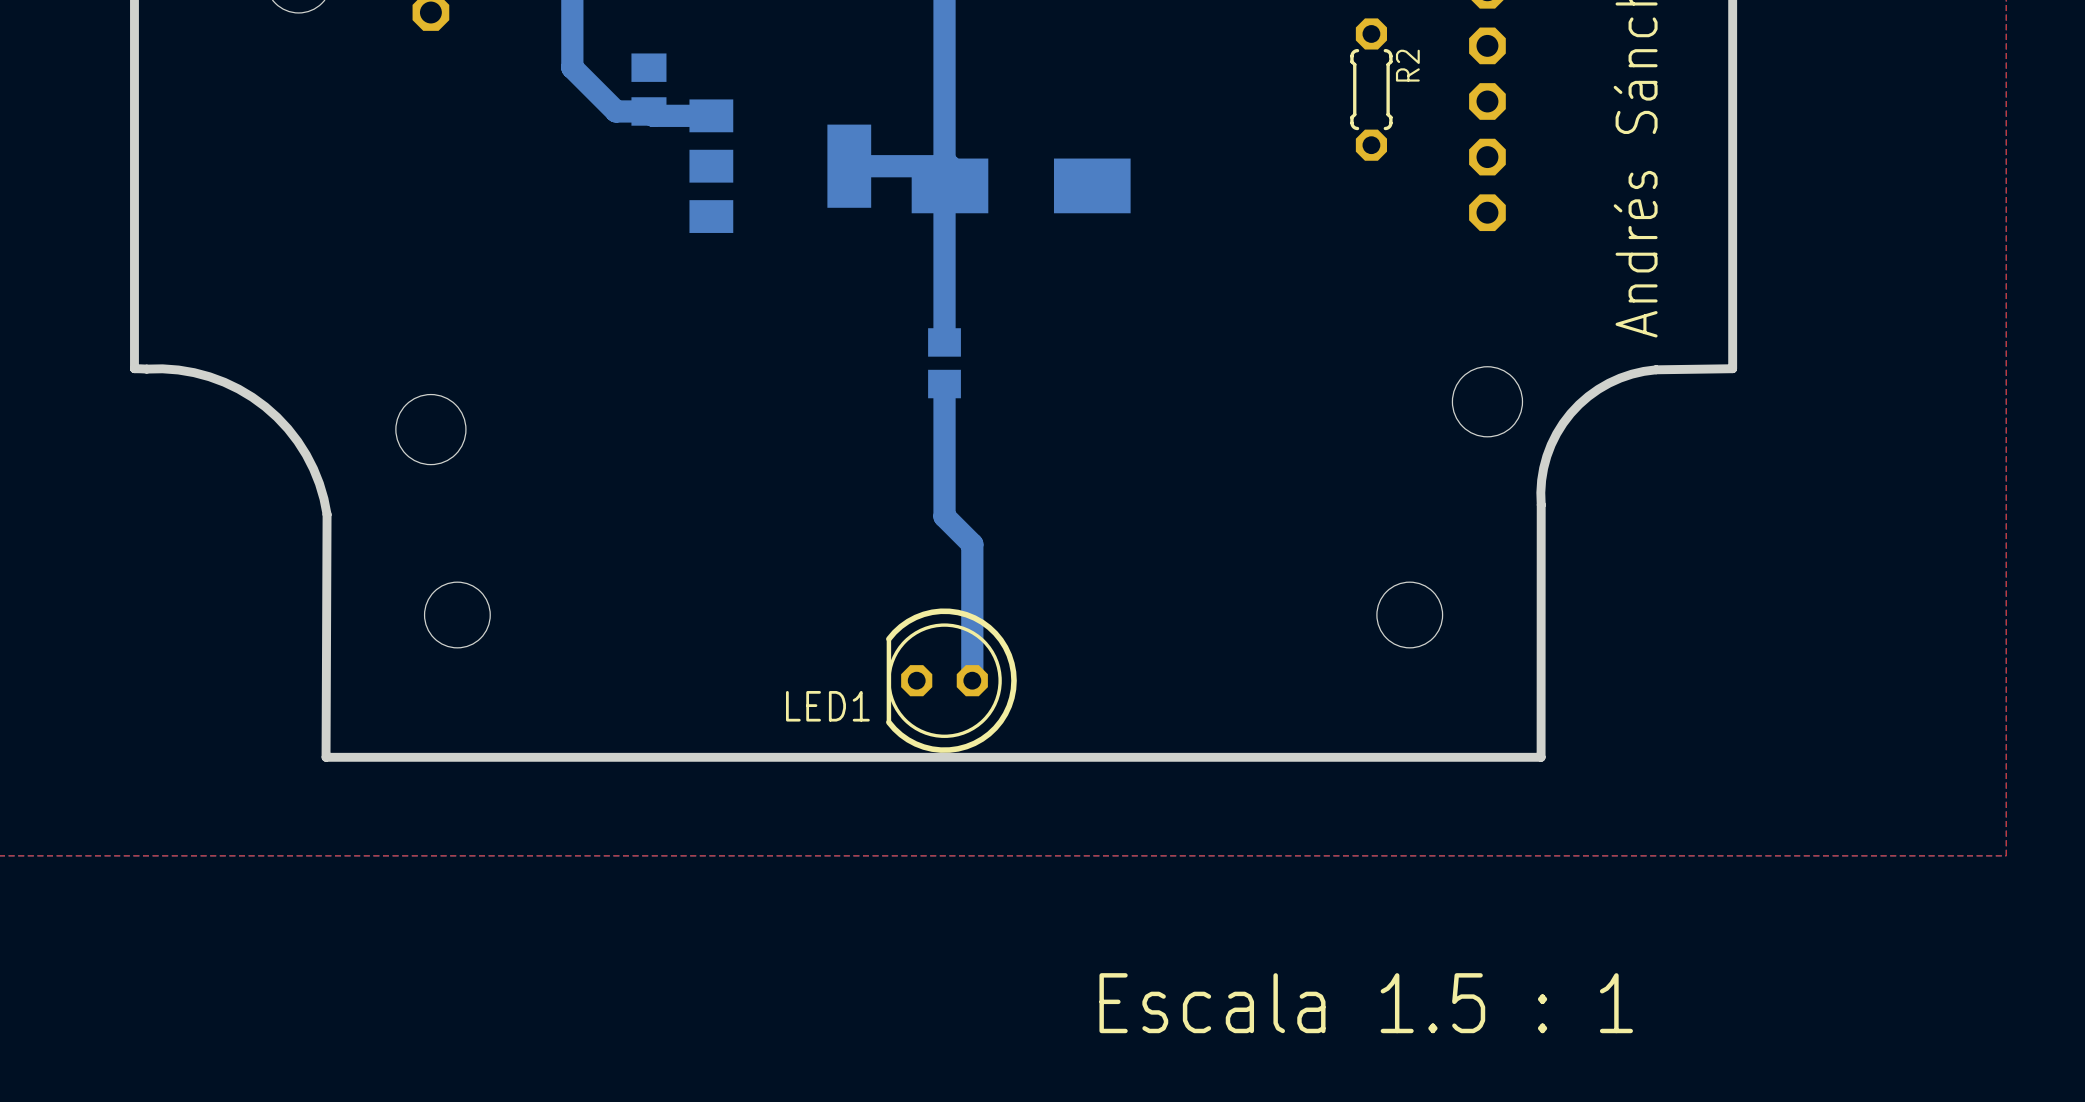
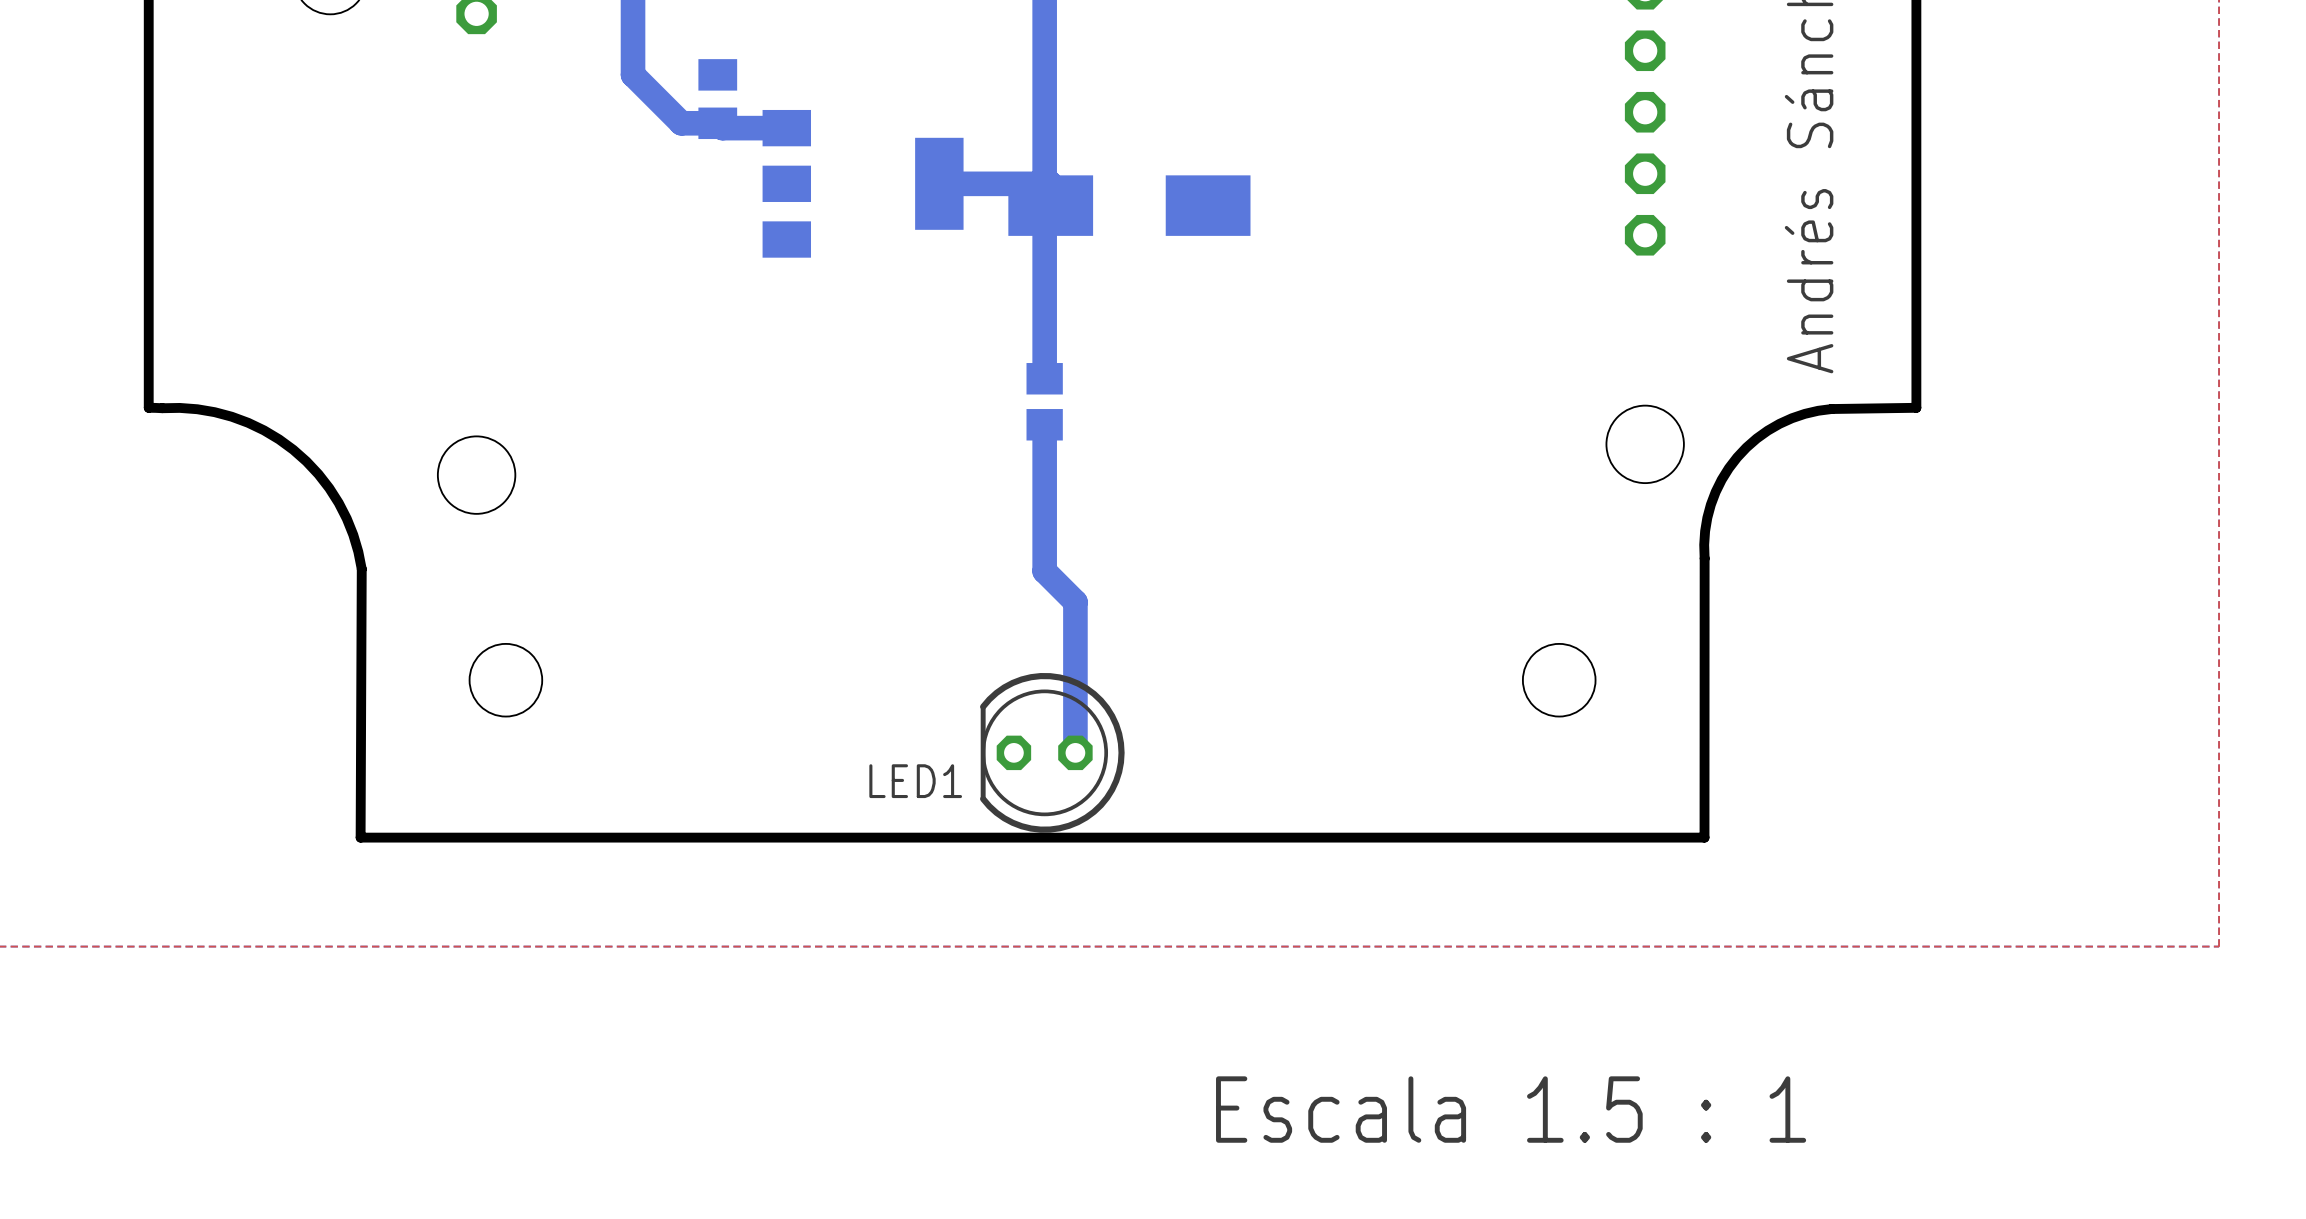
R2: (1371, 89) -> none

